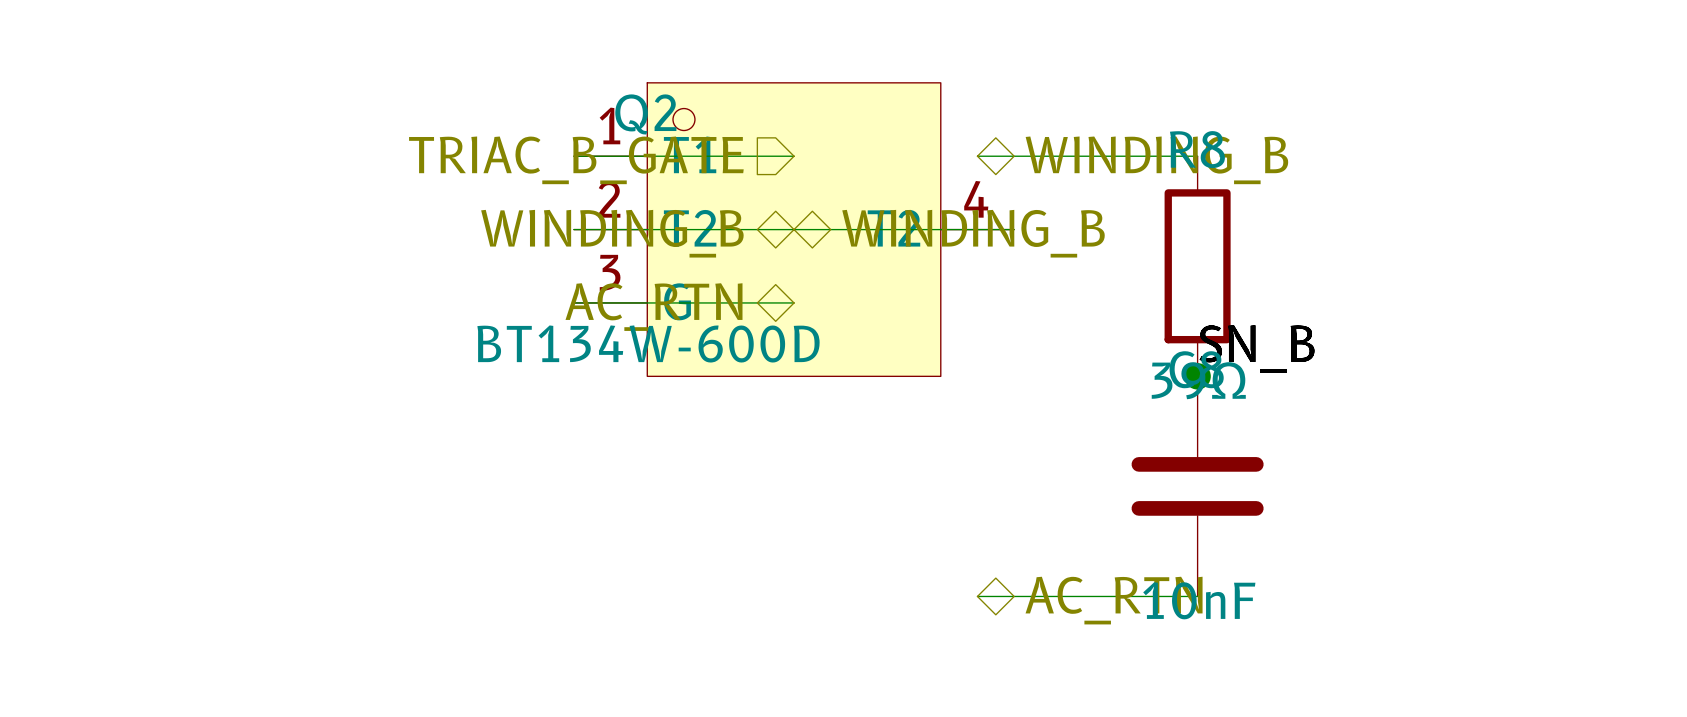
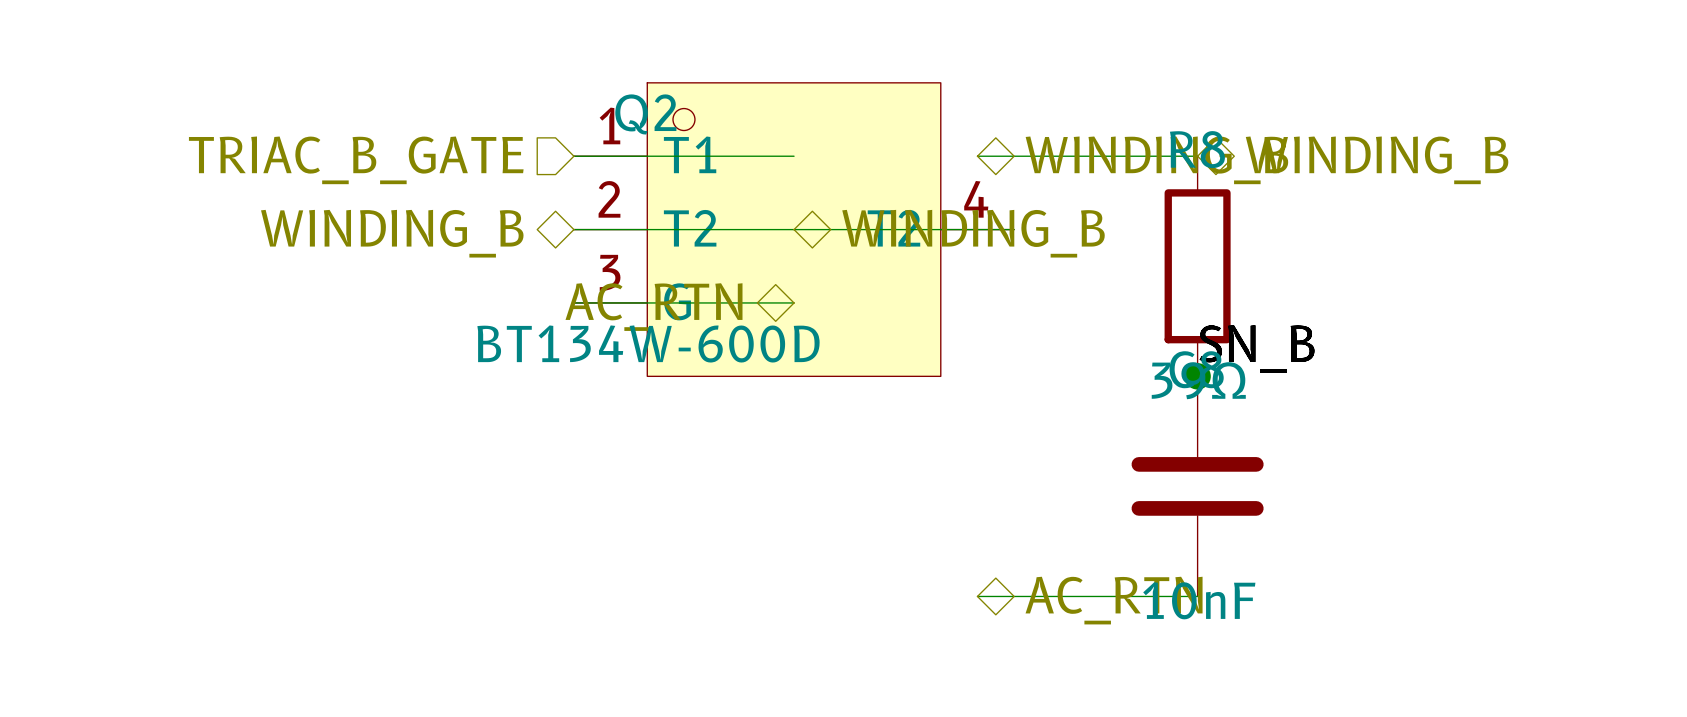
hierarchical label position: TRIAC_B_GATE (576, 160) -> TRIAC_B_GATE (356, 160)
hierarchical label: none -> WINDING_B (1377, 160)
hierarchical label position: WINDING_B (612, 233) -> WINDING_B (392, 233)

